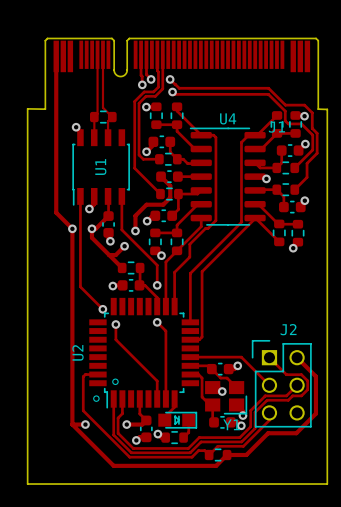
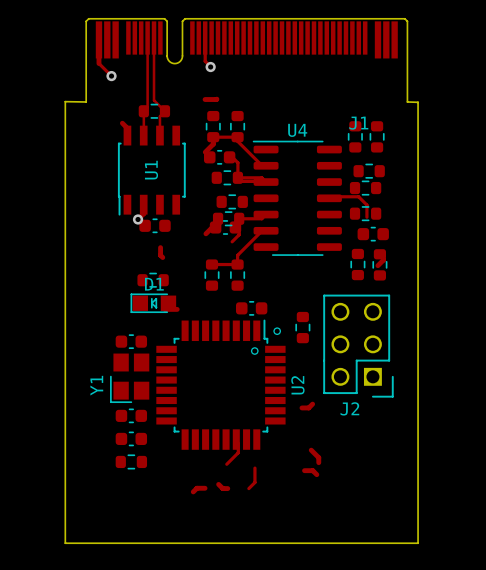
track: (141, 54) (142, 84) -> none
track: (157, 54) (158, 87) (153, 91) (144, 91) (134, 101) (134, 168) (160, 194) -> none
track: (162, 54) (162, 88) (155, 96) (146, 96) (139, 103) (139, 155) (143, 159) (159, 159) -> none
track: (56, 76) (56, 212) (72, 228) (72, 424) -> (98, 63) (111, 76)
track: (170, 79) (179, 88) (268, 88) (285, 105) (304, 105) (312, 112) (312, 128) (317, 133) (317, 153) (307, 163) (307, 177) (294, 189) -> none
via: (170, 79) -> none
via: (142, 84) -> none
via: none -> (111, 76)
track: (172, 92) (174, 94) (268, 94) (285, 111) (285, 120) (288, 123) (301, 123) (312, 135) (312, 149) (294, 167) -> none
via: (172, 92) -> none
track: (177, 106) (177, 111) (201, 135) (213, 135) (215, 137) (215, 220) (189, 244) (189, 257) (174, 272) (174, 306) -> none
via: (146, 107) -> none
part: (156, 115) -> none
part: (177, 115) -> none
track: (277, 115) (257, 135) (248, 135) (241, 142) (241, 221) (190, 273) (190, 322) -> none
via: (304, 116) -> none
track: (156, 124) (177, 124) (177, 131) (194, 149) (201, 149) -> none
part: (277, 124) -> none
part: (295, 124) -> none
via: (76, 127) -> none
part: none -> (213, 126)
part: none -> (237, 126)
track: (295, 133) (277, 133) (261, 149) (255, 149) -> none
part: none -> (355, 136)
part: none -> (377, 136)
track: none -> (217, 137) (237, 137) (237, 141) (262, 165) (266, 165)
part position: (161, 141) -> (219, 157)
track: (170, 141) (170, 152) (177, 159) (183, 159) (187, 163) (201, 162) -> none
via: (305, 144) -> none
track: (281, 150) (281, 163) (276, 167) (260, 167) (255, 162) -> none
part: (290, 150) -> none
via: (146, 151) -> none
track: none -> (229, 157) (232, 157) (237, 162) (237, 177) (261, 177) (266, 182)
part: (168, 159) -> none
part footprint: [156, 170, 183, 183] -> [211, 170, 244, 186]
track: (161, 176) (170, 185) (170, 197) (163, 204) (146, 204) (135, 215) (135, 231) -> none
U4 position: (227, 176) -> (297, 198)
via: (266, 178) -> none
part: none -> (365, 188)
part: (285, 189) -> none
track: (201, 190) (197, 194) (178, 194) (178, 209) (172, 215) -> none
track: (80, 196) (80, 286) (102, 309) -> none
track: (108, 196) (108, 216) (95, 228) (91, 228) (91, 237) (122, 267) -> none
track: (121, 196) (121, 229) (157, 265) (157, 285) -> none
via: (304, 200) -> none
track: none -> (266, 214) (261, 218) (239, 218) (239, 234) (232, 241)
track: (201, 204) (197, 204) (177, 225) (177, 232) (155, 232) -> none
track: (255, 204) (258, 204) (278, 223) (297, 224) -> none
part: none -> (365, 213)
part position: (292, 207) -> (373, 234)
part: none -> (228, 218)
track: none -> (266, 230) (262, 230) (237, 255) (237, 264) (214, 264)
track: (201, 218) (201, 226) (165, 261) (165, 306) -> none
via: (147, 221) -> none
part rotation: 0° (108, 224) -> 90° clockwise (155, 225)
via: (72, 228) -> none
via: (91, 228) -> none
via: (135, 231) -> none
part: (279, 232) -> none
part: (297, 233) -> none
via: (110, 241) -> none
part: (155, 241) -> none
part: (177, 241) -> none
track: (279, 241) (255, 218) (202, 271) (202, 337) (199, 339) (190, 339) -> none
track: (124, 246) (115, 255) (109, 255) -> none
via: (124, 246) -> none
part: none -> (357, 264)
part: none -> (379, 264)
via: (293, 248) -> none
via: (161, 255) -> none
part: none -> (211, 275)
part: none -> (237, 275)
part: none -> (153, 280)
part: (131, 267) -> none
track: (140, 267) (139, 285) (144, 285) (157, 297) (157, 306) -> none
D1: none -> (153, 303)
part: none -> (251, 308)
part: (131, 285) -> none
via: (157, 285) -> none
via: (112, 286) -> none
part: none -> (302, 327)
via: (102, 309) -> none
part: none -> (131, 341)
track: (157, 322) (165, 331) (165, 398) -> none
via: (157, 322) -> none
track: (115, 324) (115, 339) (157, 381) (157, 398) -> none
via: (115, 324) -> none
U2 rotation: 0° (144, 353) -> 180° (220, 384)
track: (190, 357) (241, 357) (269, 385) -> none
track: (269, 357) (286, 374) (301, 374) (307, 380) (307, 389) (301, 395) (292, 395) (288, 400) (267, 400) (255, 412) (255, 428) (241, 441) (201, 441) (190, 452) (131, 452) (113, 435) (113, 398) -> none
track: (297, 357) (315, 376) (315, 413) (296, 433) (268, 433) (246, 454) (227, 454) (216, 465) (113, 465) (72, 424) -> none
track: (190, 365) (208, 365) (220, 378) (227, 378) (236, 387) -> none
via: (237, 365) -> none
part: (220, 369) -> none
track: (97, 374) (85, 374) (83, 376) (83, 410) (129, 457) (192, 457) (198, 450) (204, 450) (209, 454) (217, 446) (243, 446) (269, 420) (269, 412) -> none
track: (190, 374) (198, 374) (202, 378) (202, 397) (209, 404) (212, 404) (214, 422) -> none
part: none -> (131, 415)
J2 rotation: 0° (281, 383) -> 180° (358, 346)
J2 position: (281, 383) -> (358, 346)
track: (297, 385) (286, 395) (265, 395) (250, 410) (250, 426) (239, 437) (199, 437) (188, 448) (133, 448) (118, 433) (118, 418) (122, 413) (122, 398) -> none
via: (222, 391) -> none
part: none -> (131, 438)
Y1 rotation: 0° (225, 397) -> 90° clockwise (129, 378)
Y1 position: (225, 397) -> (129, 378)
track: (139, 398) (139, 413) (146, 420) (142, 424) (126, 424) -> none
part: none -> (131, 461)
via: (242, 415) -> none
part: (177, 420) -> none
part: (222, 422) -> none
track: (72, 424) (85, 424) -> none
via: (85, 424) -> none
via: (126, 424) -> none
via: (241, 425) -> none
part: (146, 428) -> none
via: (157, 434) -> none
part: (174, 437) -> none
via: (136, 440) -> none
part: (218, 454) -> none

